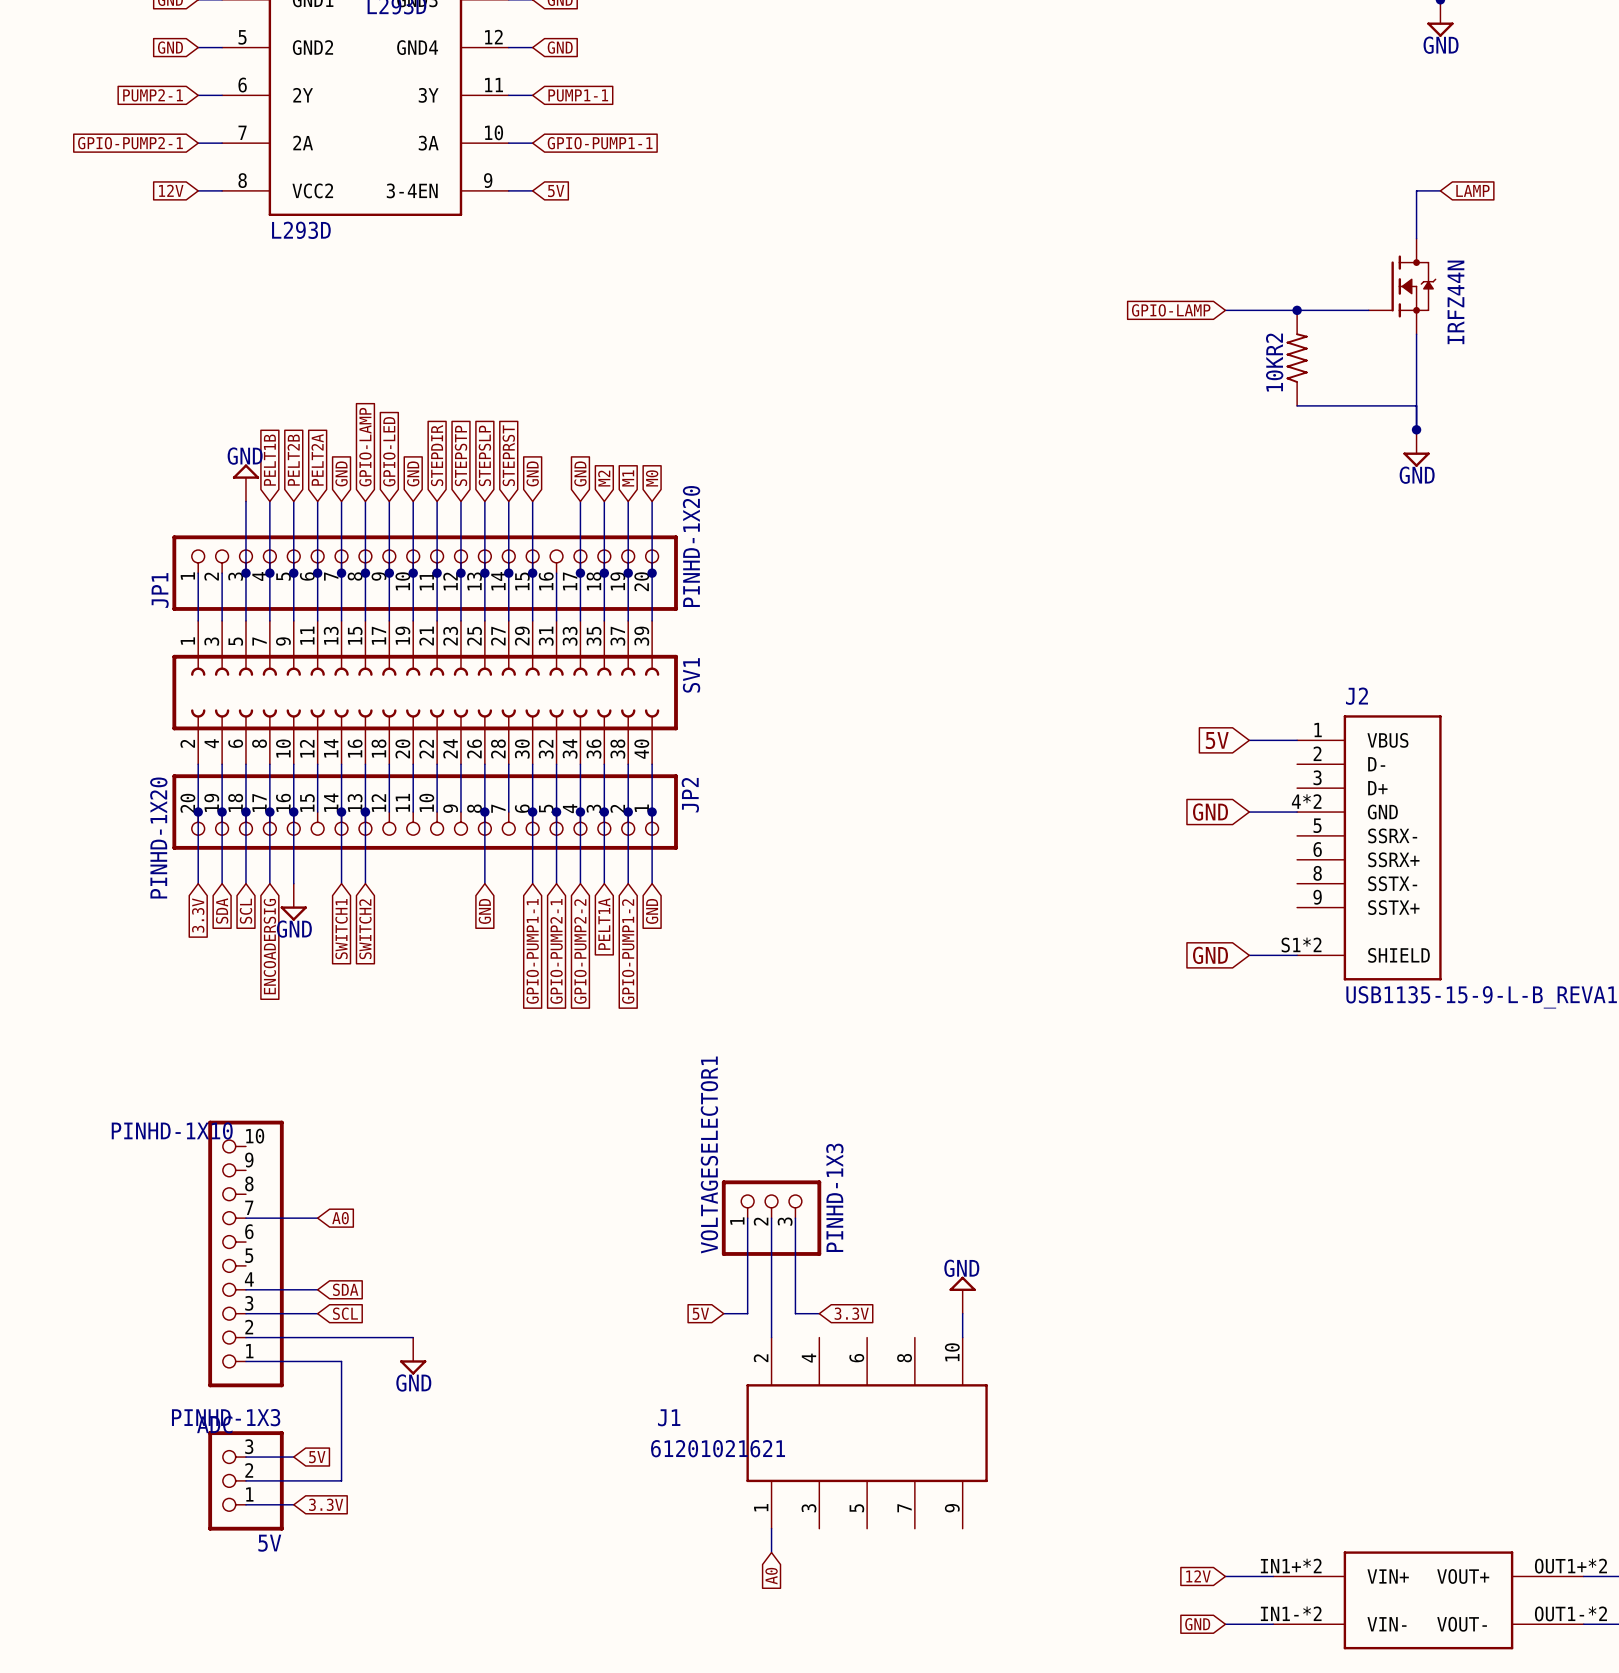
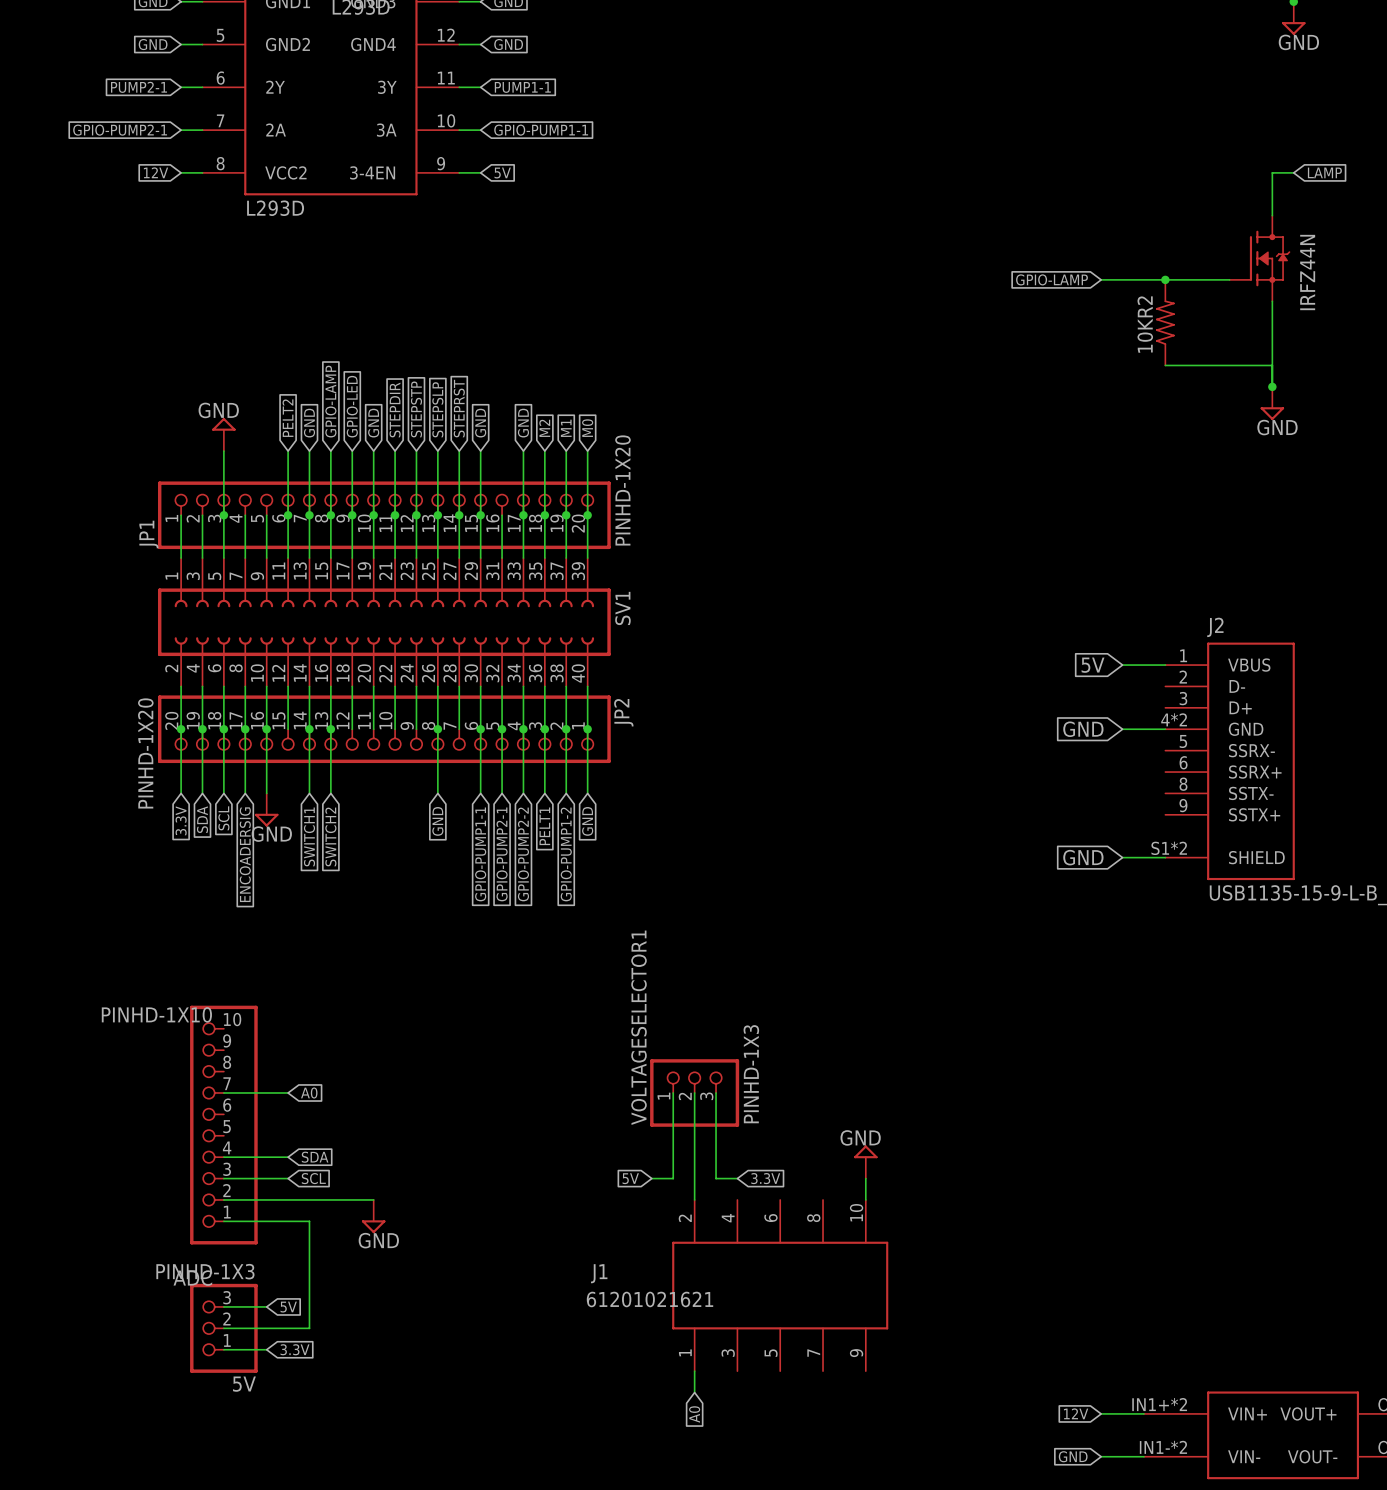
global label: PELT2A (317, 459) -> PELT2 (287, 418)
global label: PELT1B (269, 460) -> none
global label: PELT2B (293, 460) -> none
wire: (269, 501) (269, 573) -> none
wire: (293, 501) (293, 573) -> none
junction: (269, 573) -> none
junction: (293, 573) -> none
global label: PELT1A (604, 924) -> PELT1 (544, 826)

